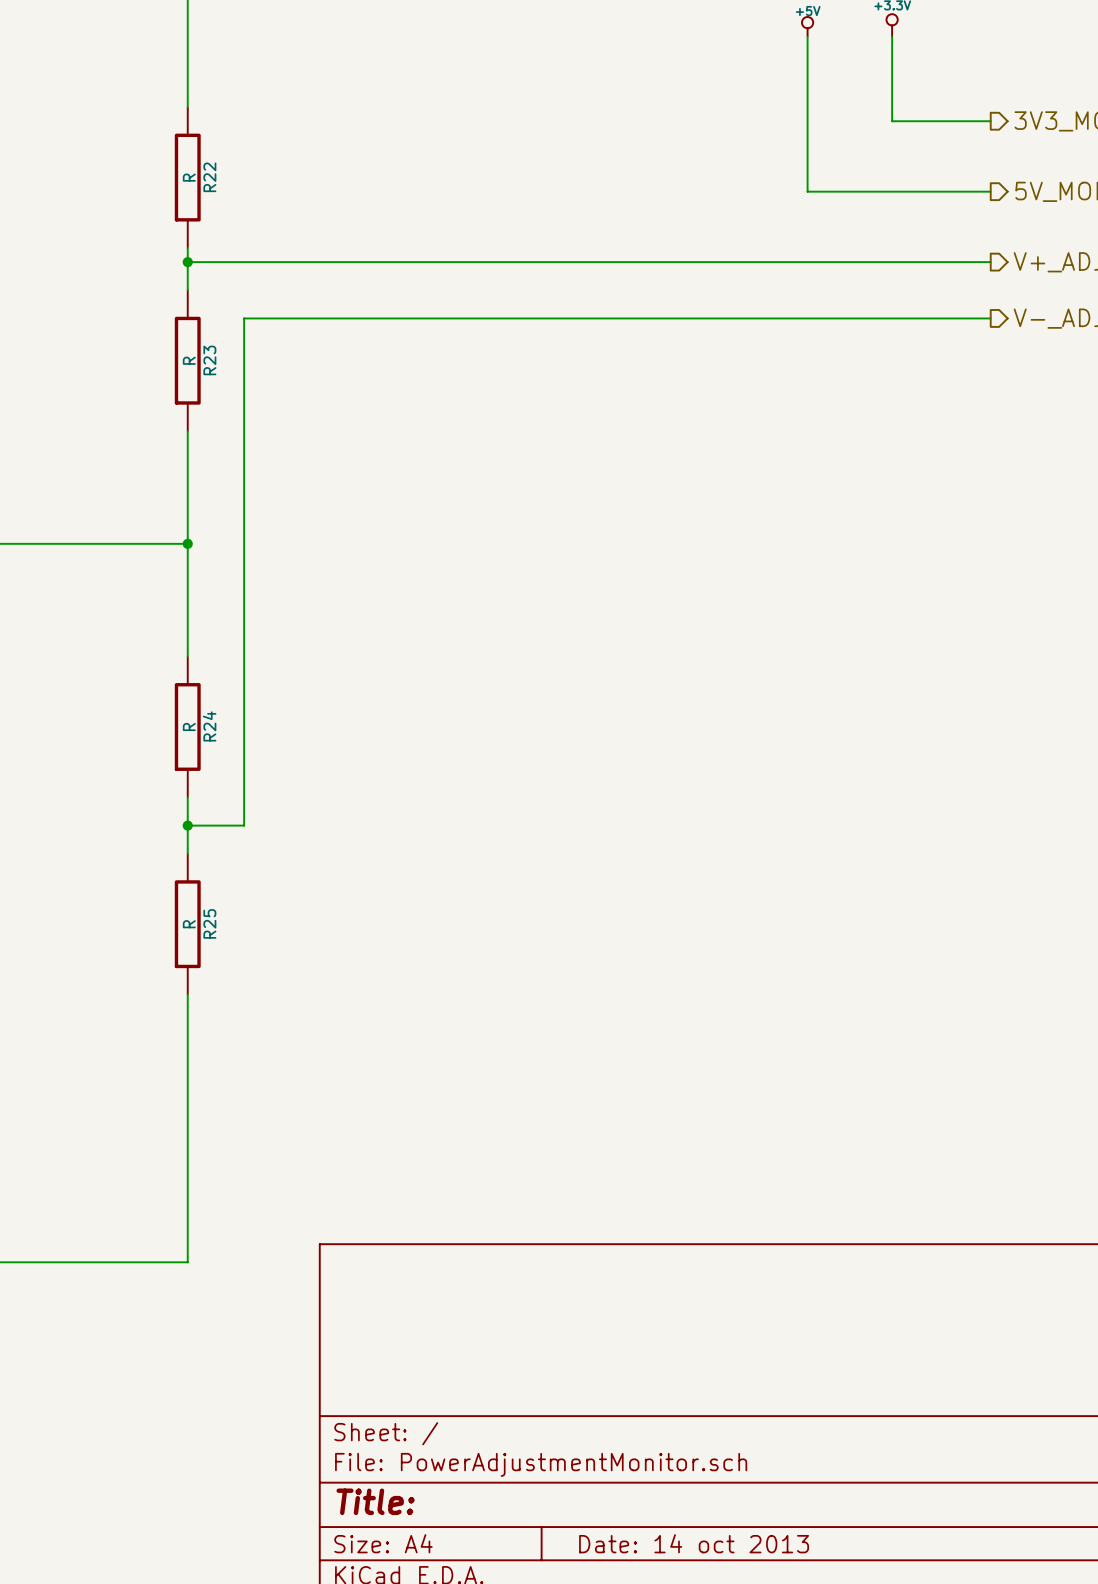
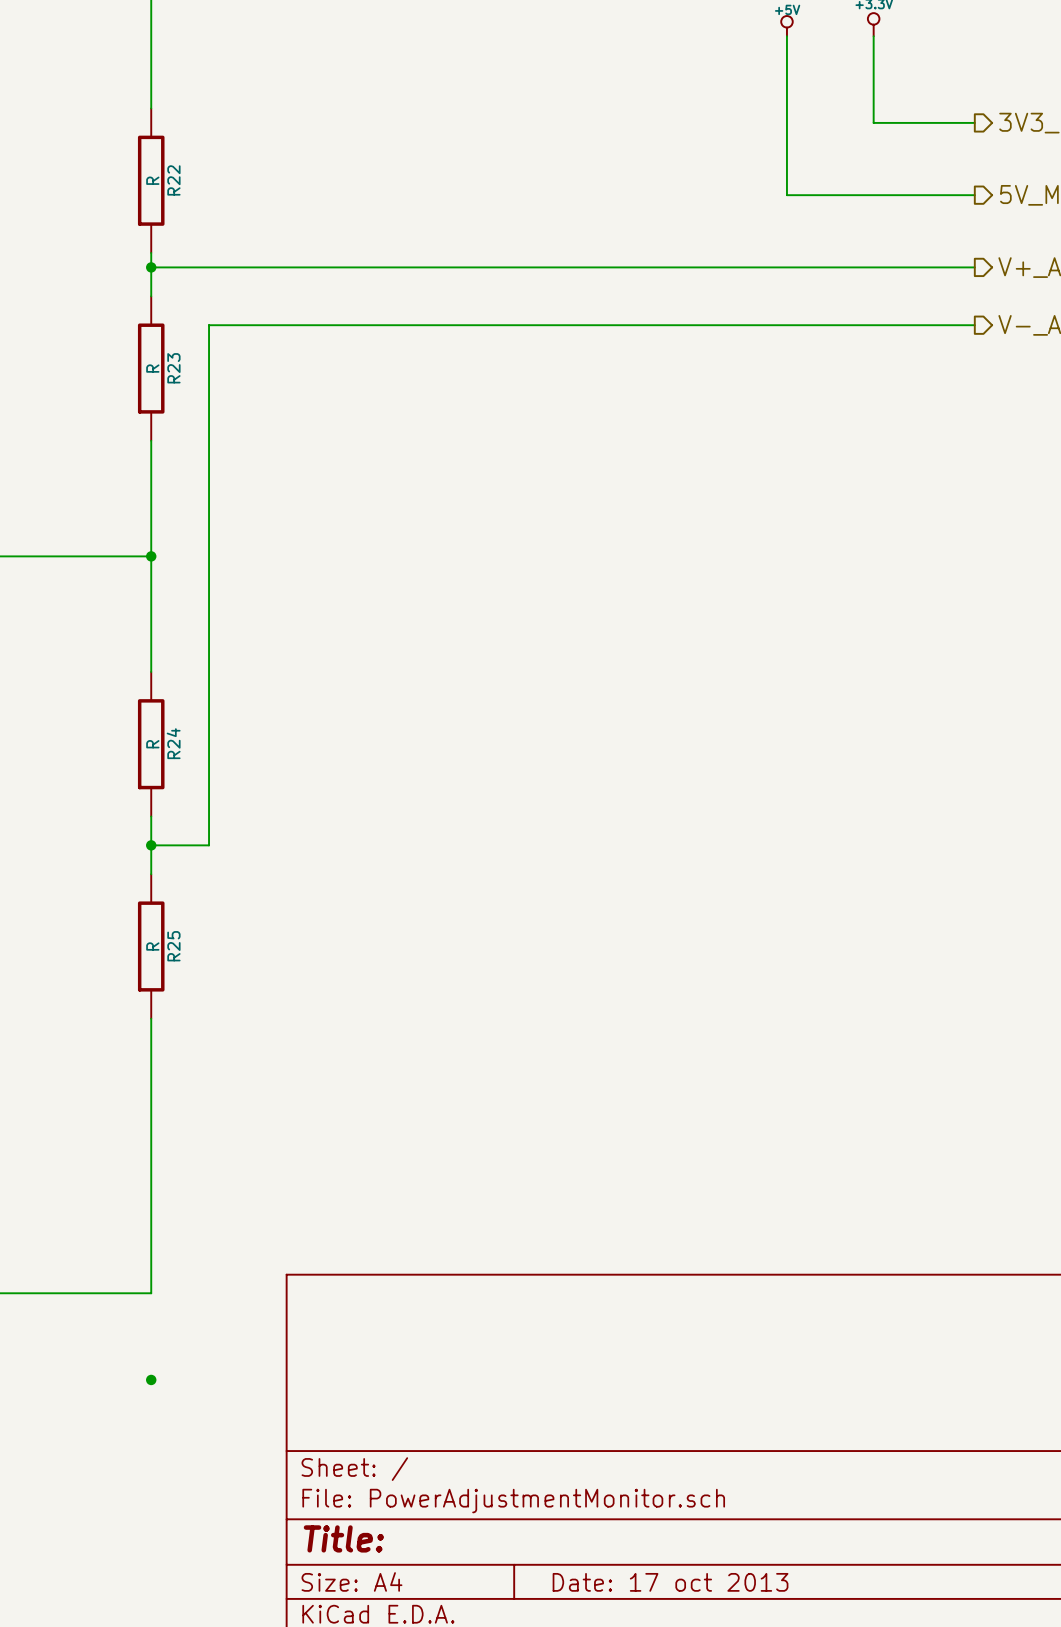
junction: none -> (151, 1379)
title block: Date: 14 oct 2013 (694, 1543) -> Date: 17 oct 2013 (670, 1582)

